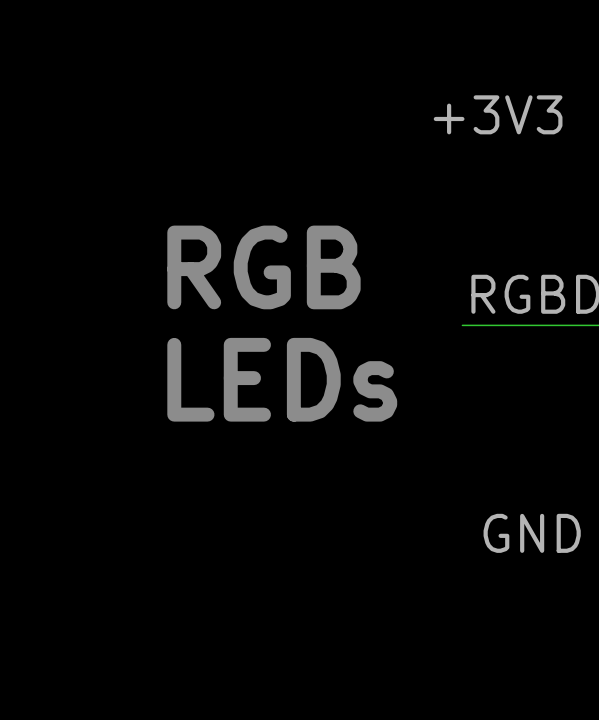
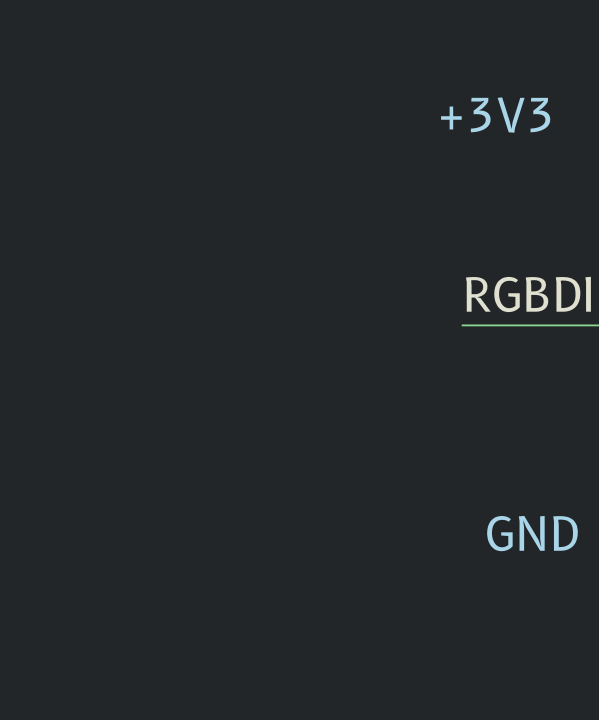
text: RGB (263, 267) -> none
text: LEDs (282, 379) -> none

